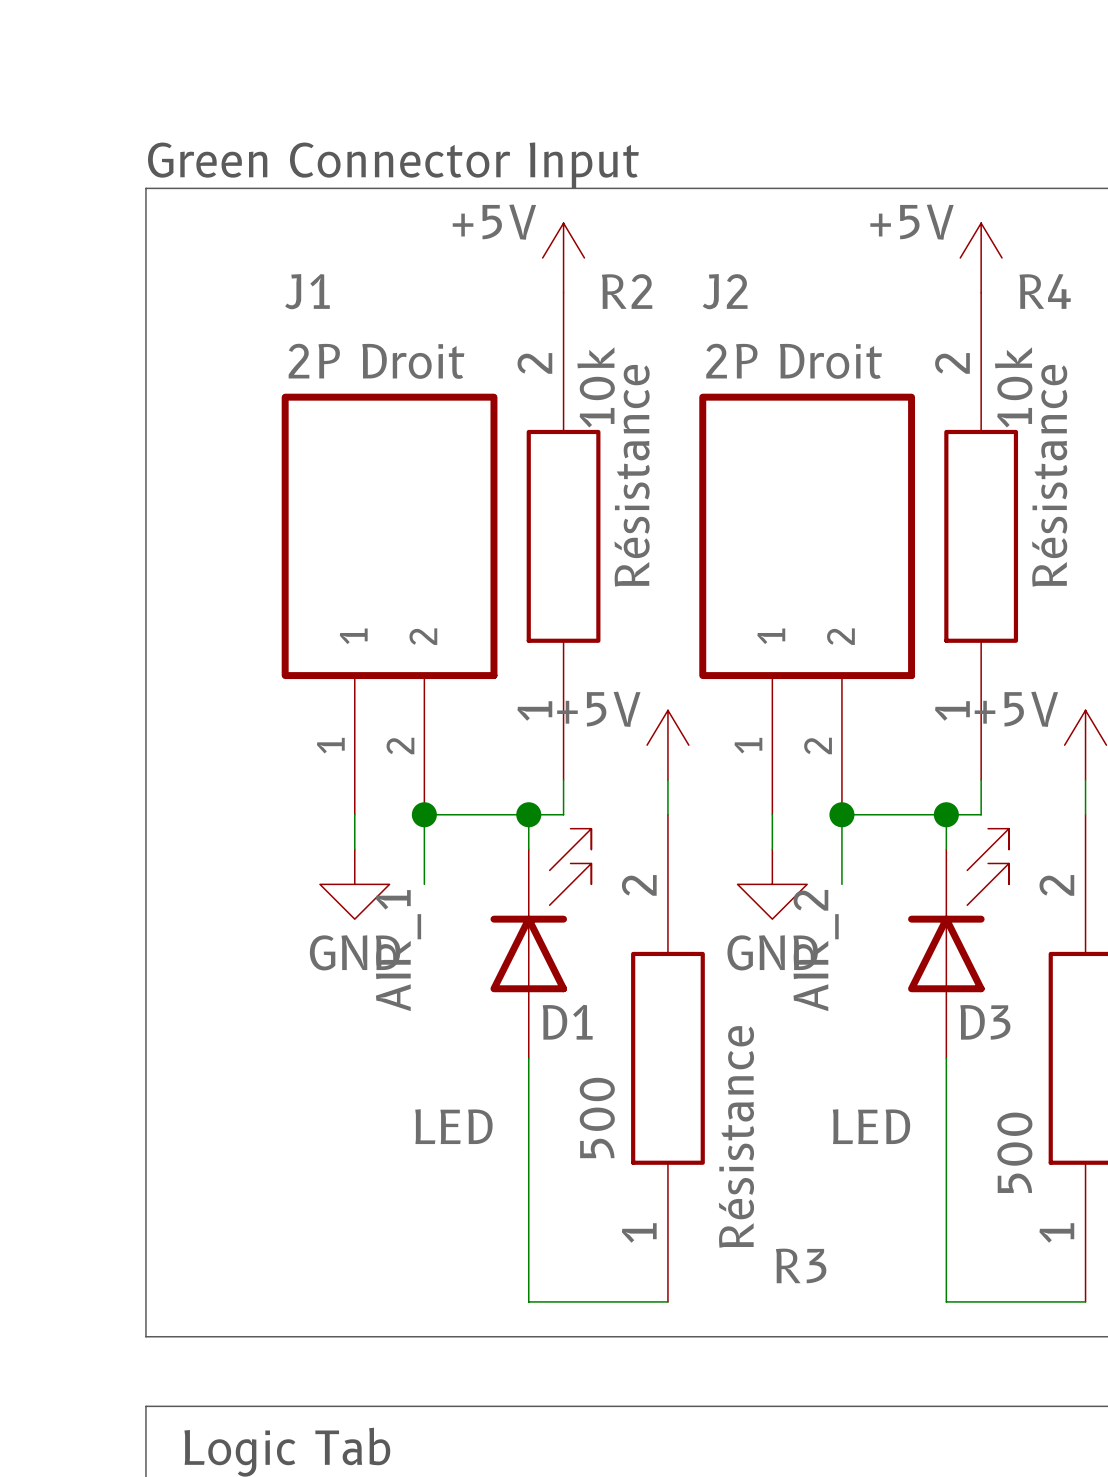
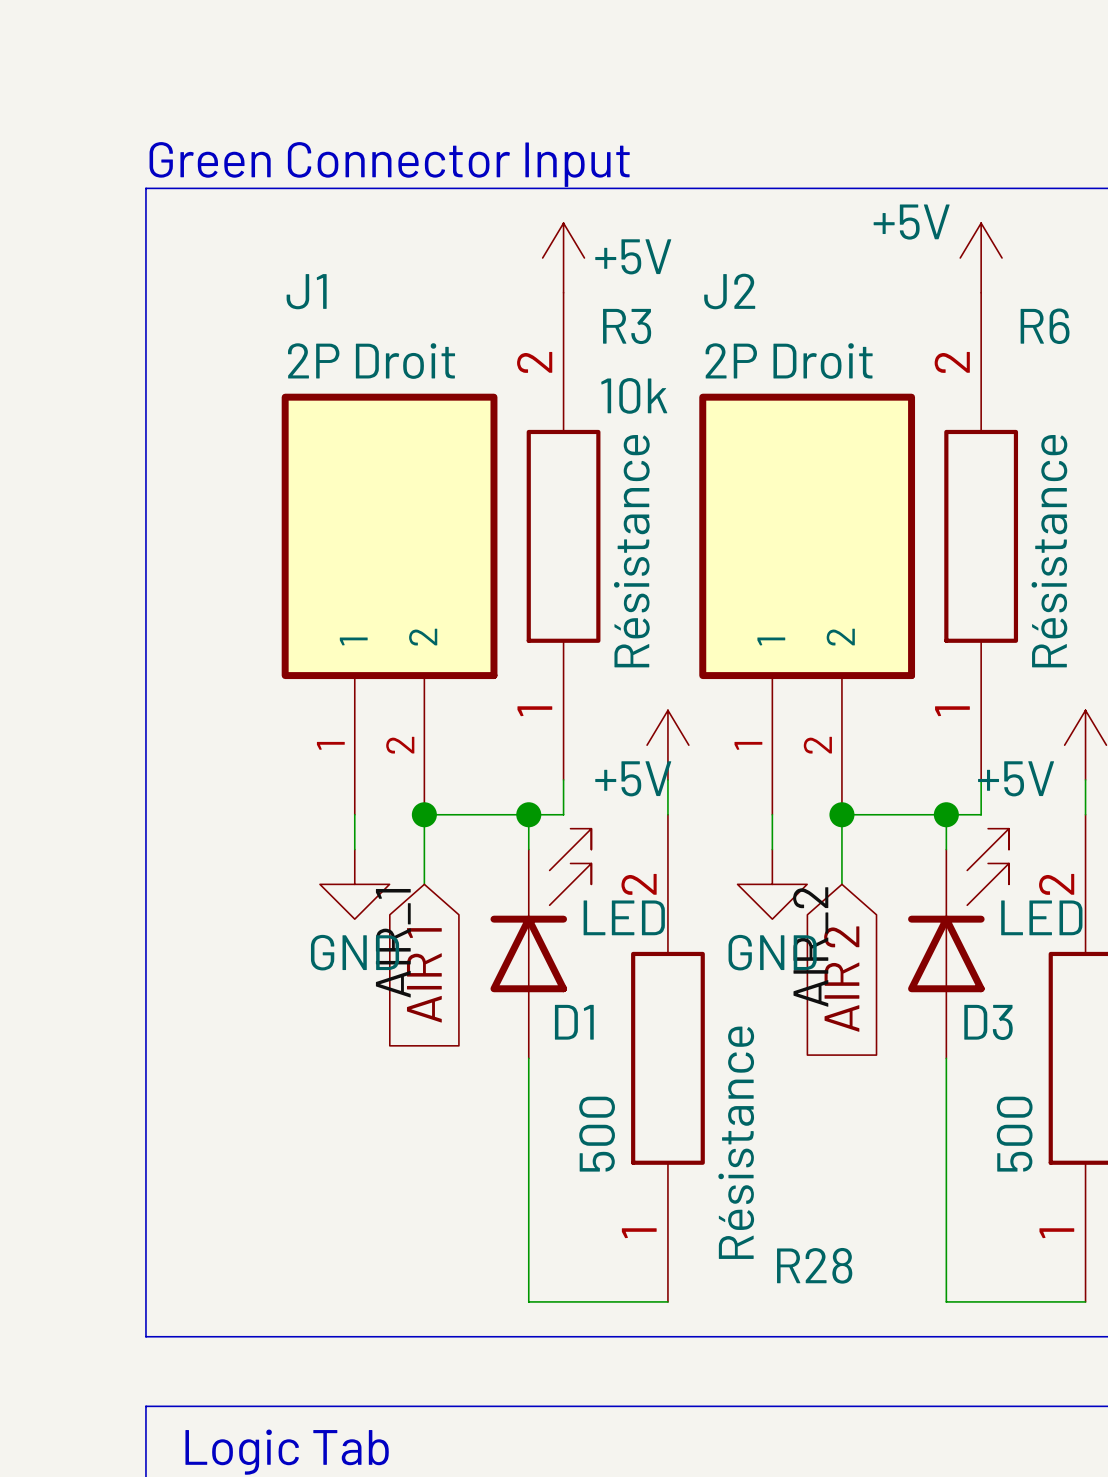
power symbol text position: +5V (494, 222) -> +5V (633, 256)
R2 name: R2 (627, 291) -> R3 (627, 326)
R4 name: R4 (1045, 291) -> R6 (1045, 326)
R2 value: 10k (596, 387) -> none
R4 value: 10k (1013, 387) -> none
R2 text: none -> 10k (634, 395)
R2 text position: Résistance (632, 475) -> Résistance (631, 551)
R4 text position: Résistance (1049, 475) -> Résistance (1049, 551)
power symbol text position: +5V (598, 709) -> +5V (633, 778)
power symbol text position: +5V (1016, 709) -> +5V (1016, 778)
global label: none -> AIR 1 (424, 975)
global label: none -> AIR 2 (841, 979)
R3 value: 500 (597, 1117) -> none
D1 value position: LED (453, 1126) -> LED (624, 917)
D3 value position: LED (871, 1126) -> LED (1041, 917)
R3 text: none -> 500 (597, 1134)
part text: none -> 500 (1014, 1134)
part value: 500 (1014, 1152) -> none
R3 name: R3 (801, 1265) -> R28 (814, 1265)

